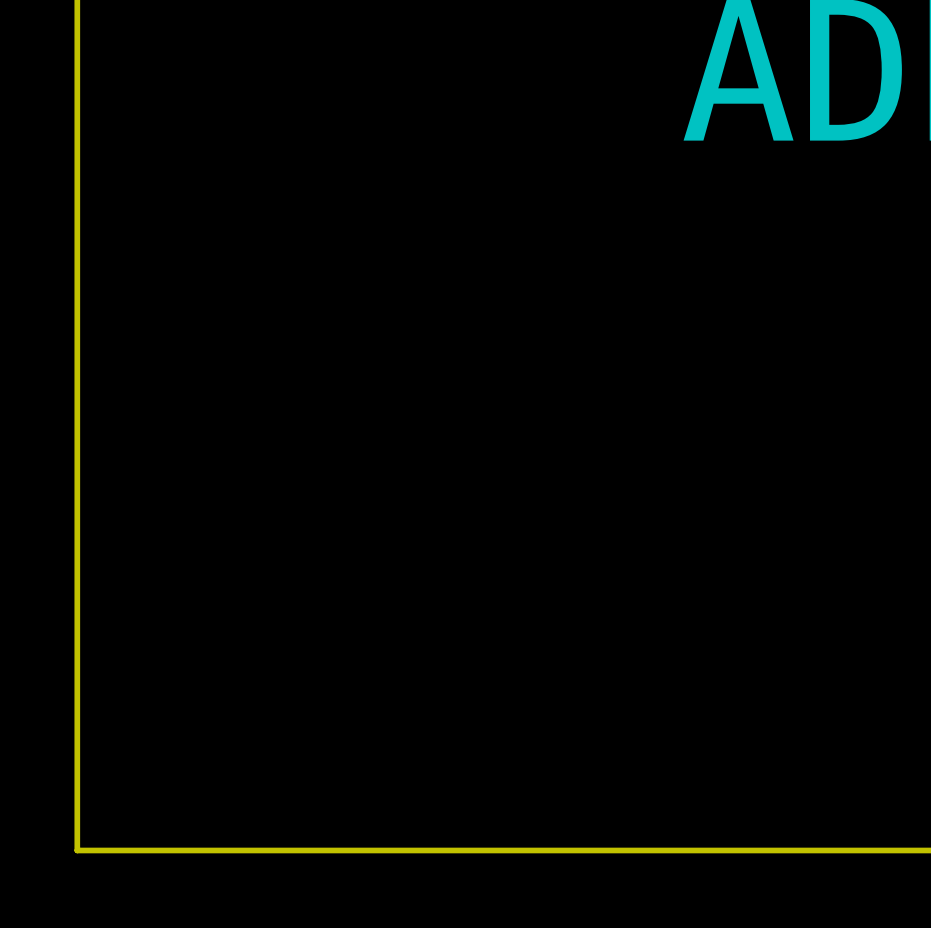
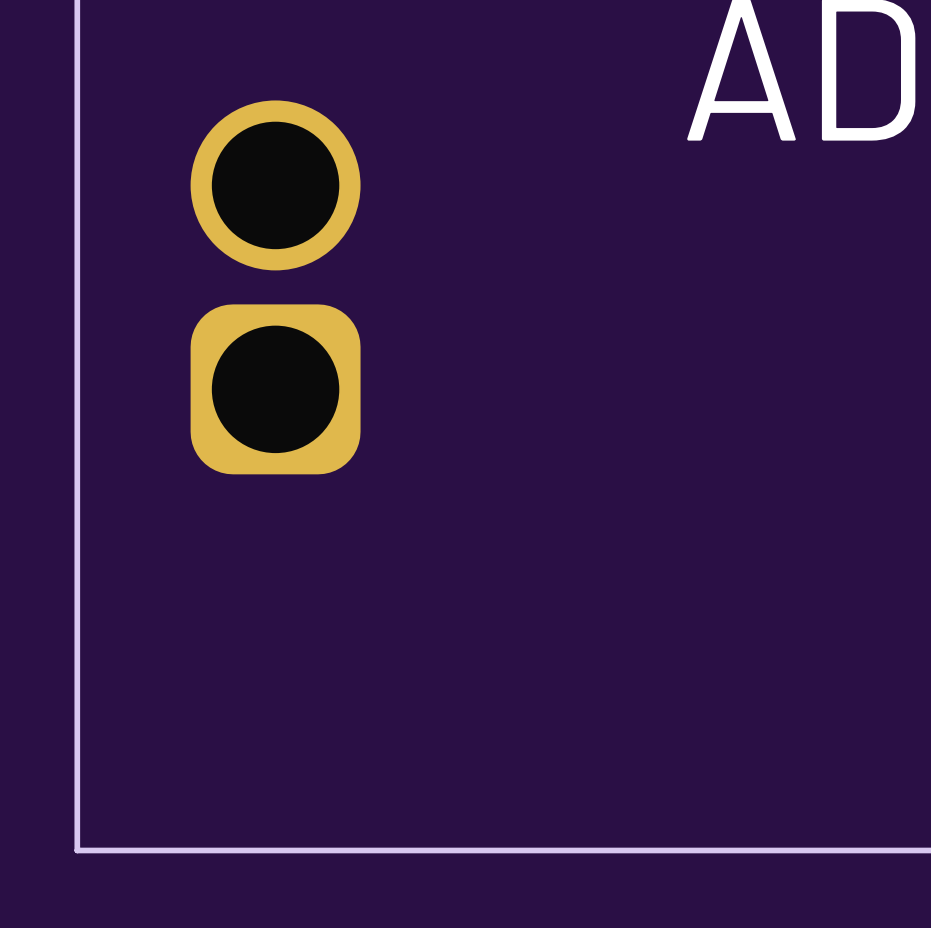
part: none -> (275, 287)

